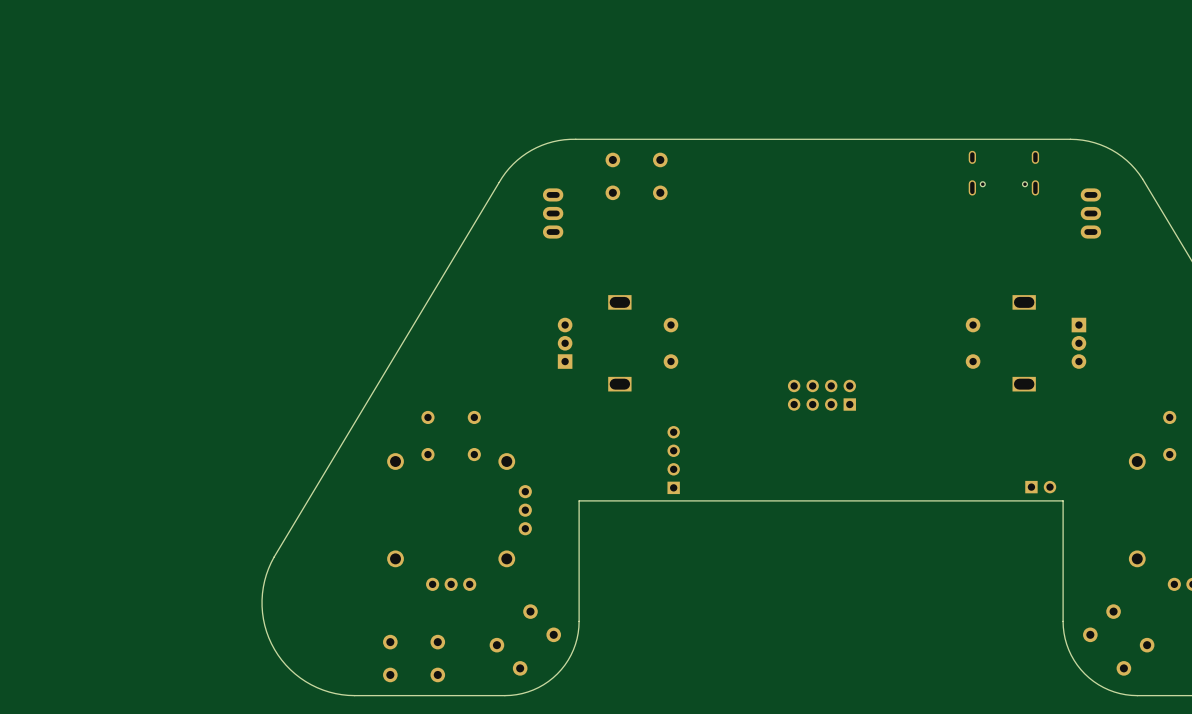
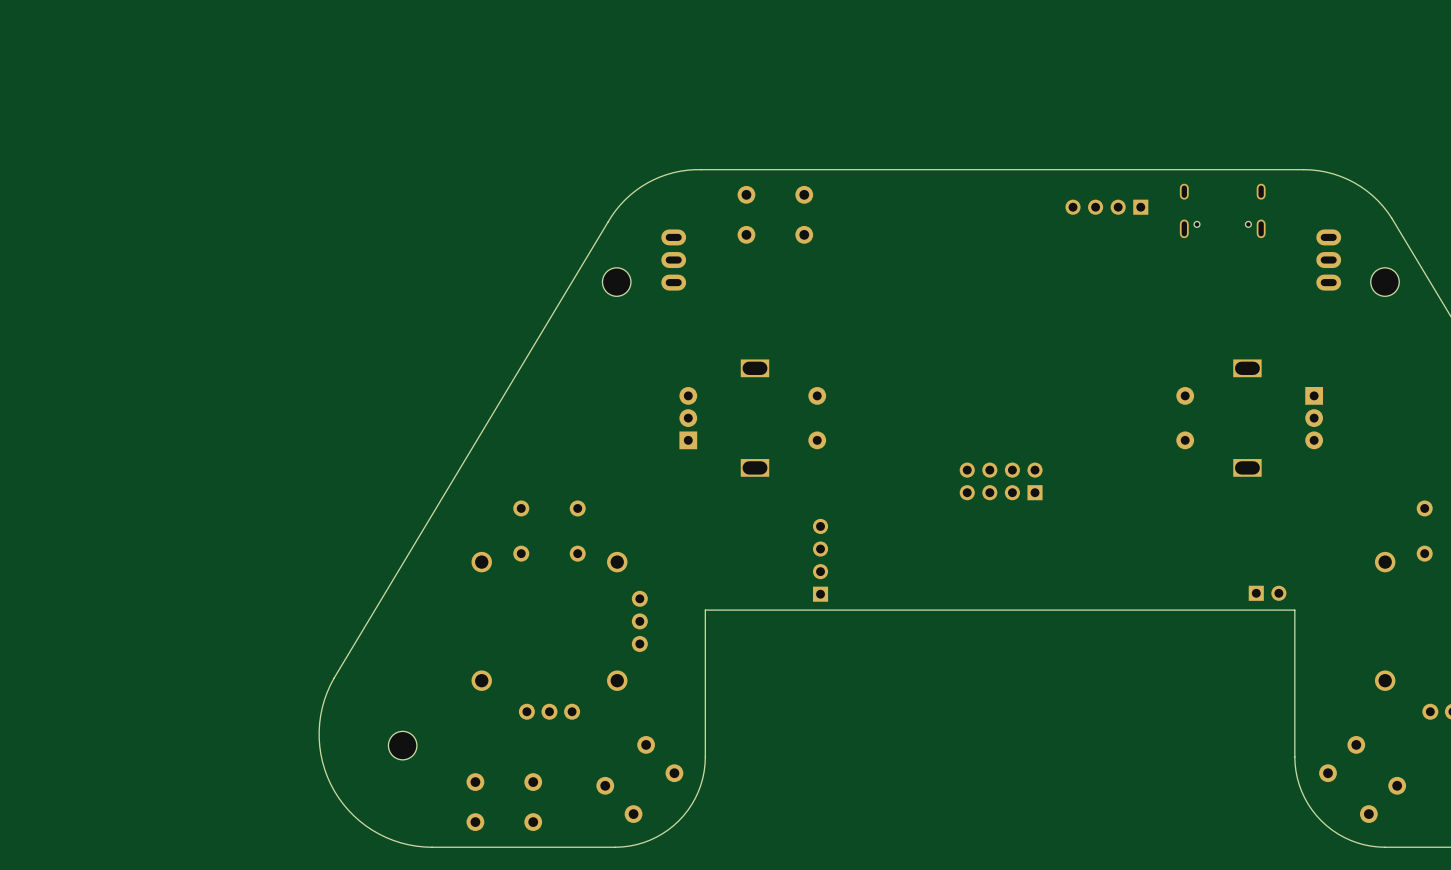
part: none -> (1106, 207)
part: none -> (616, 282)
part: none -> (1385, 282)
part: none -> (402, 745)

